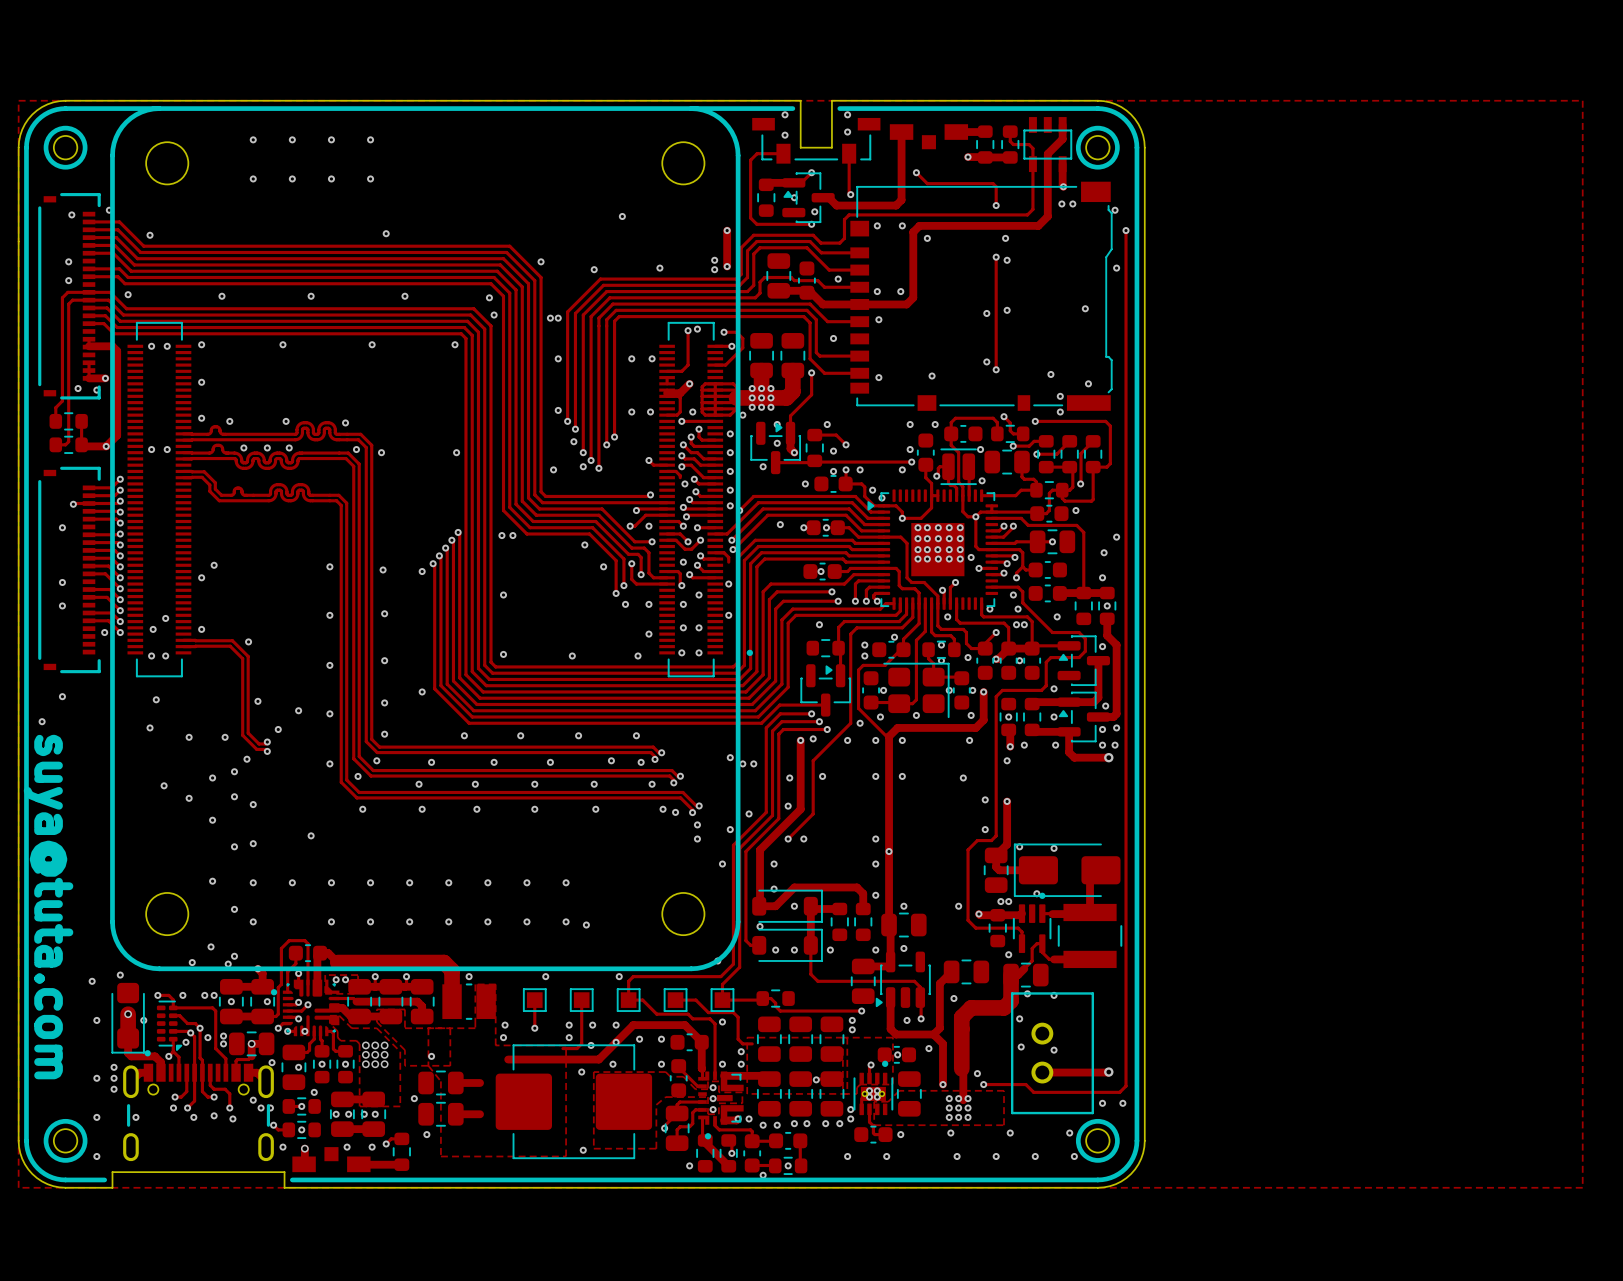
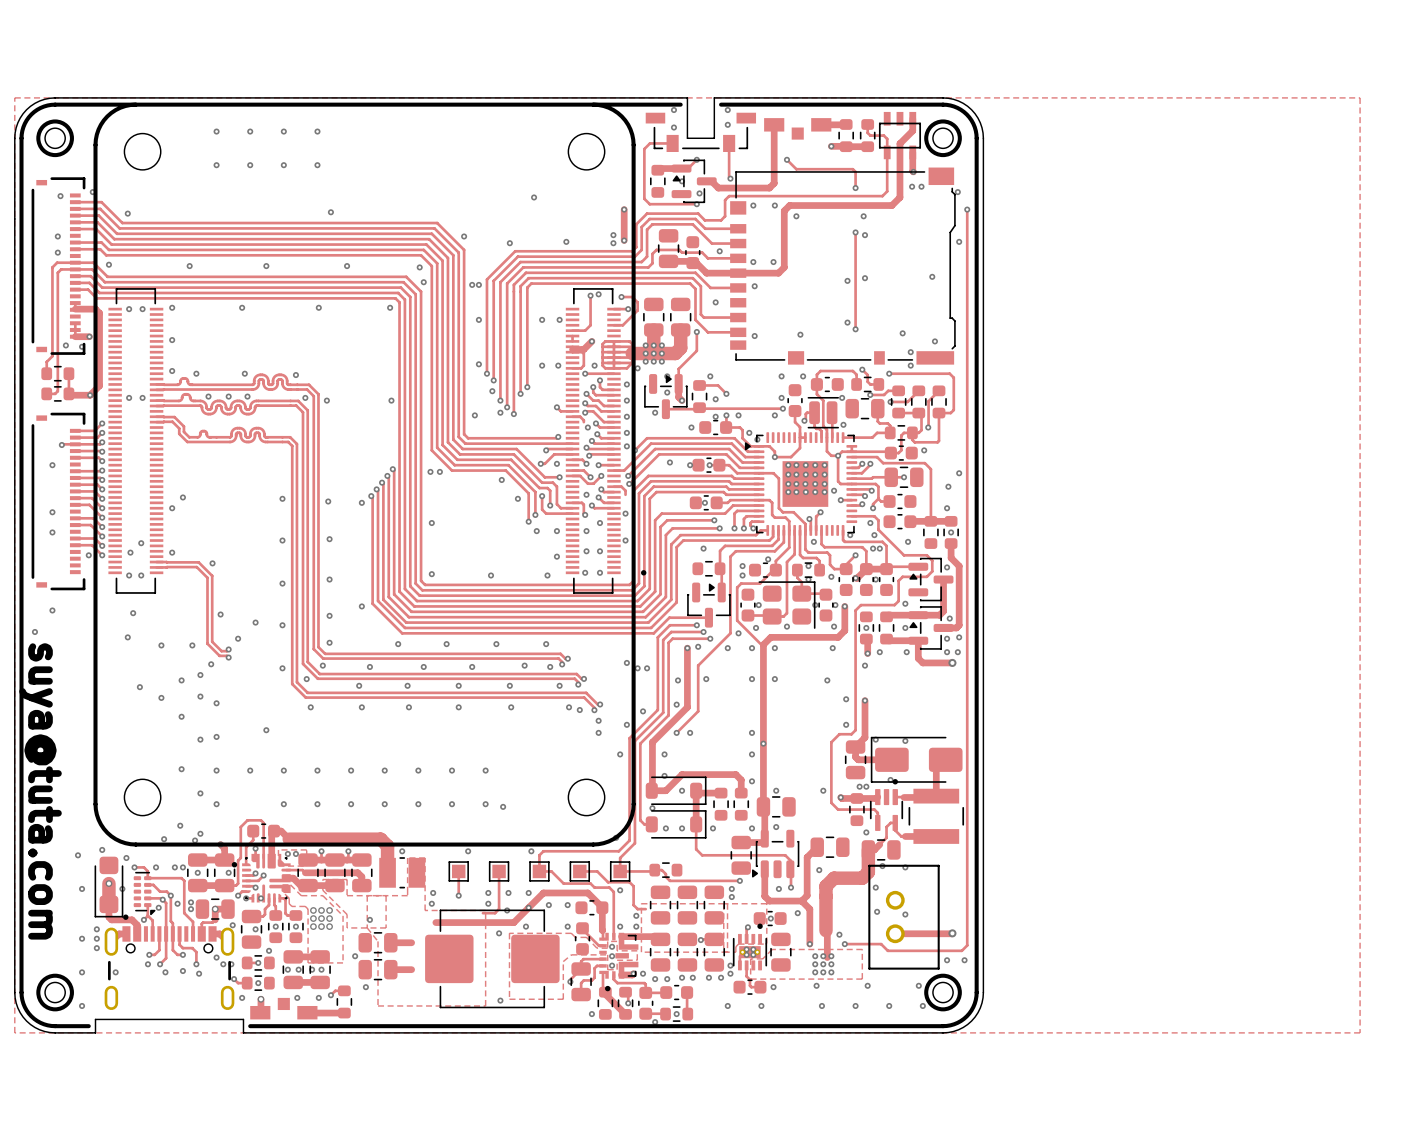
via: none -> (126, 858)

